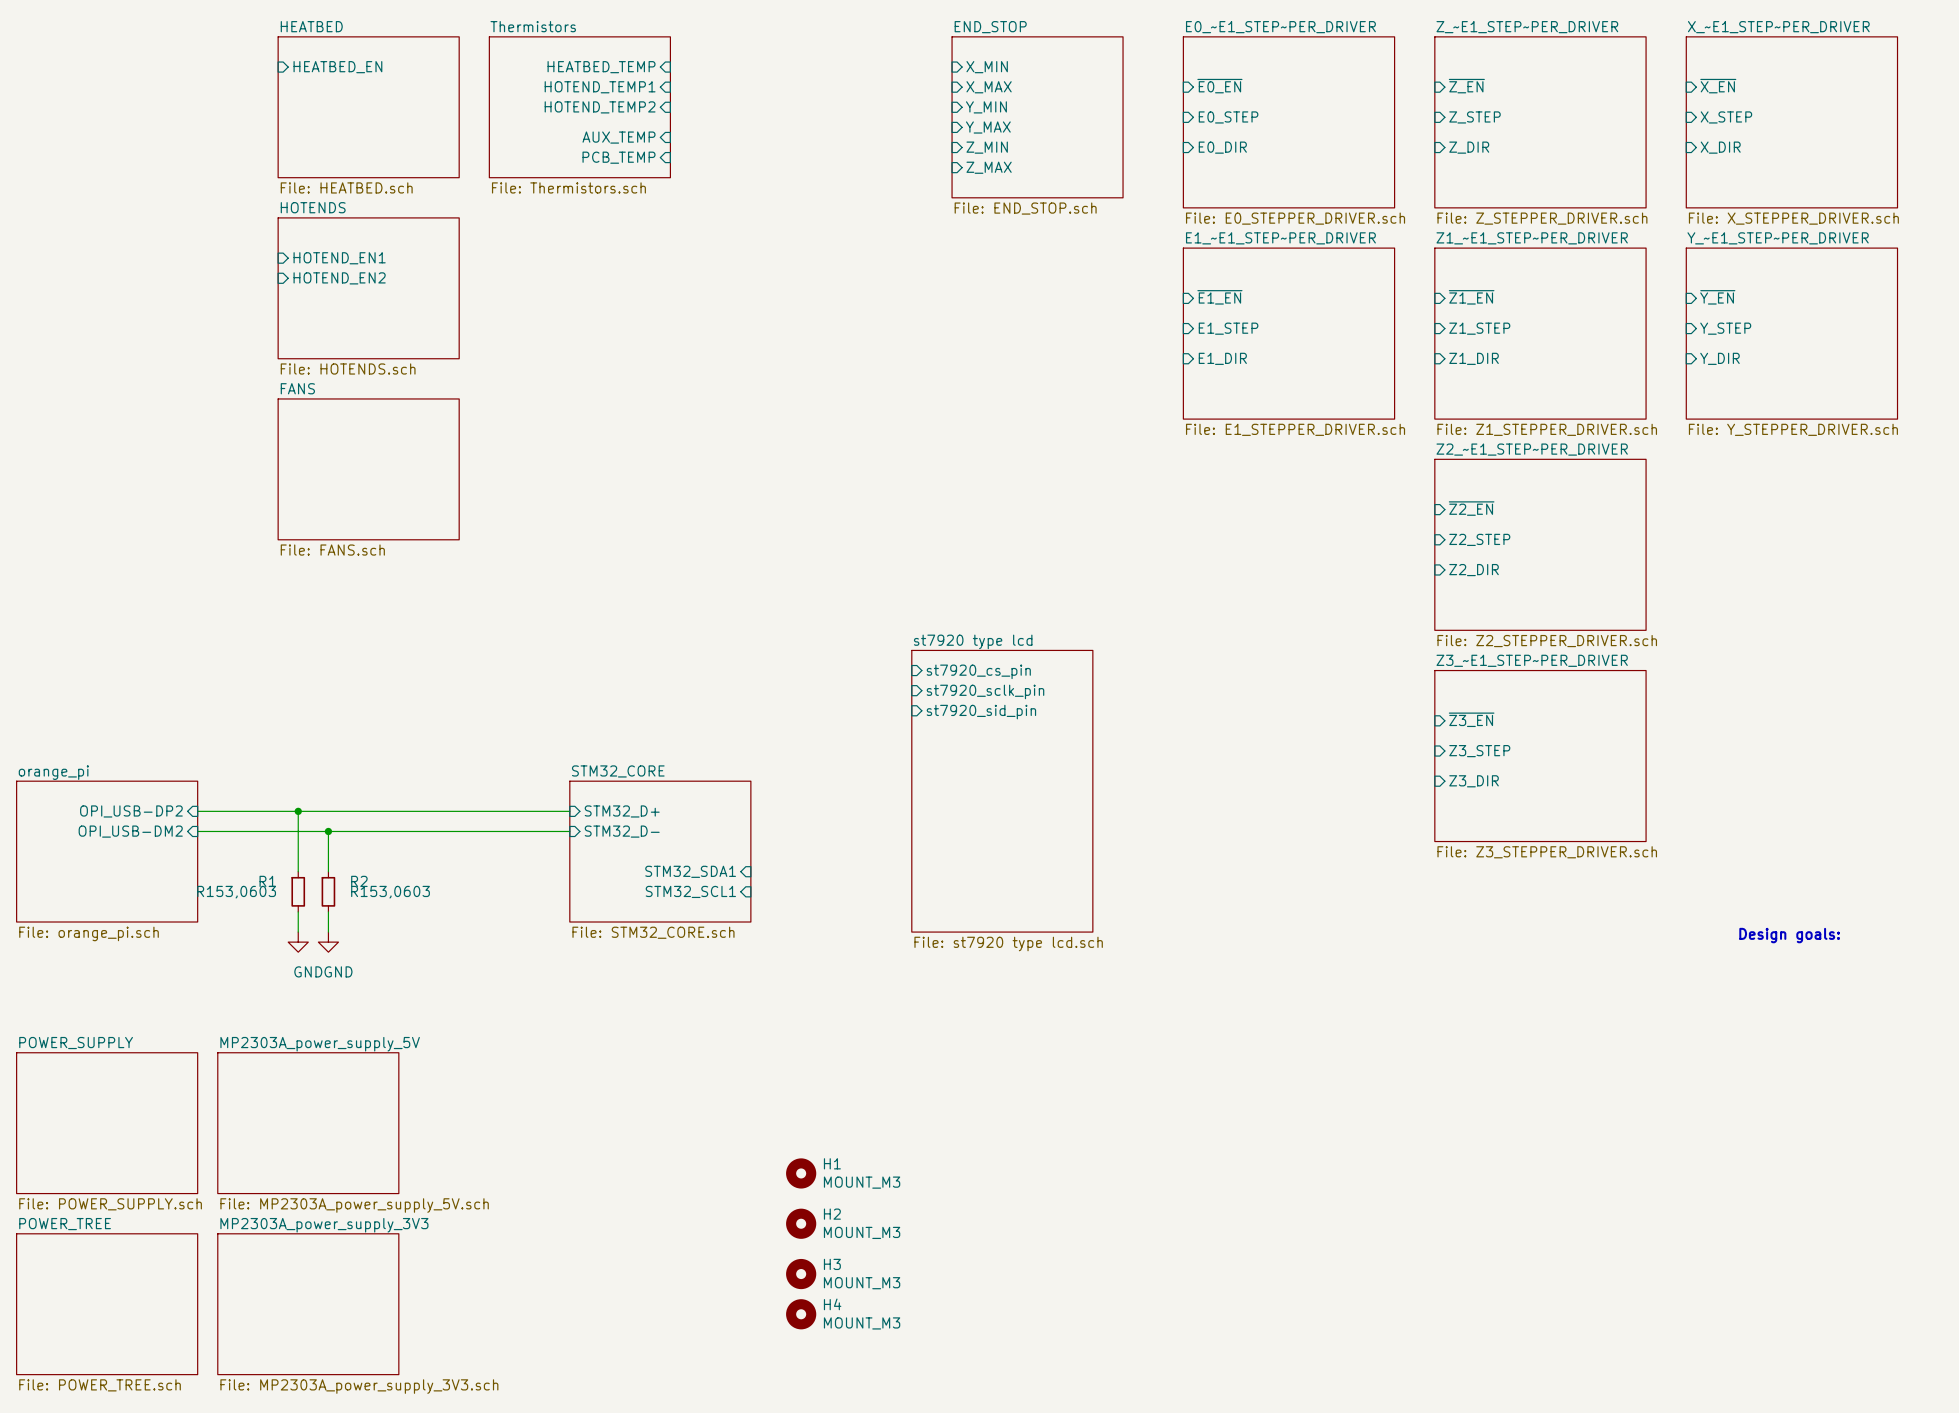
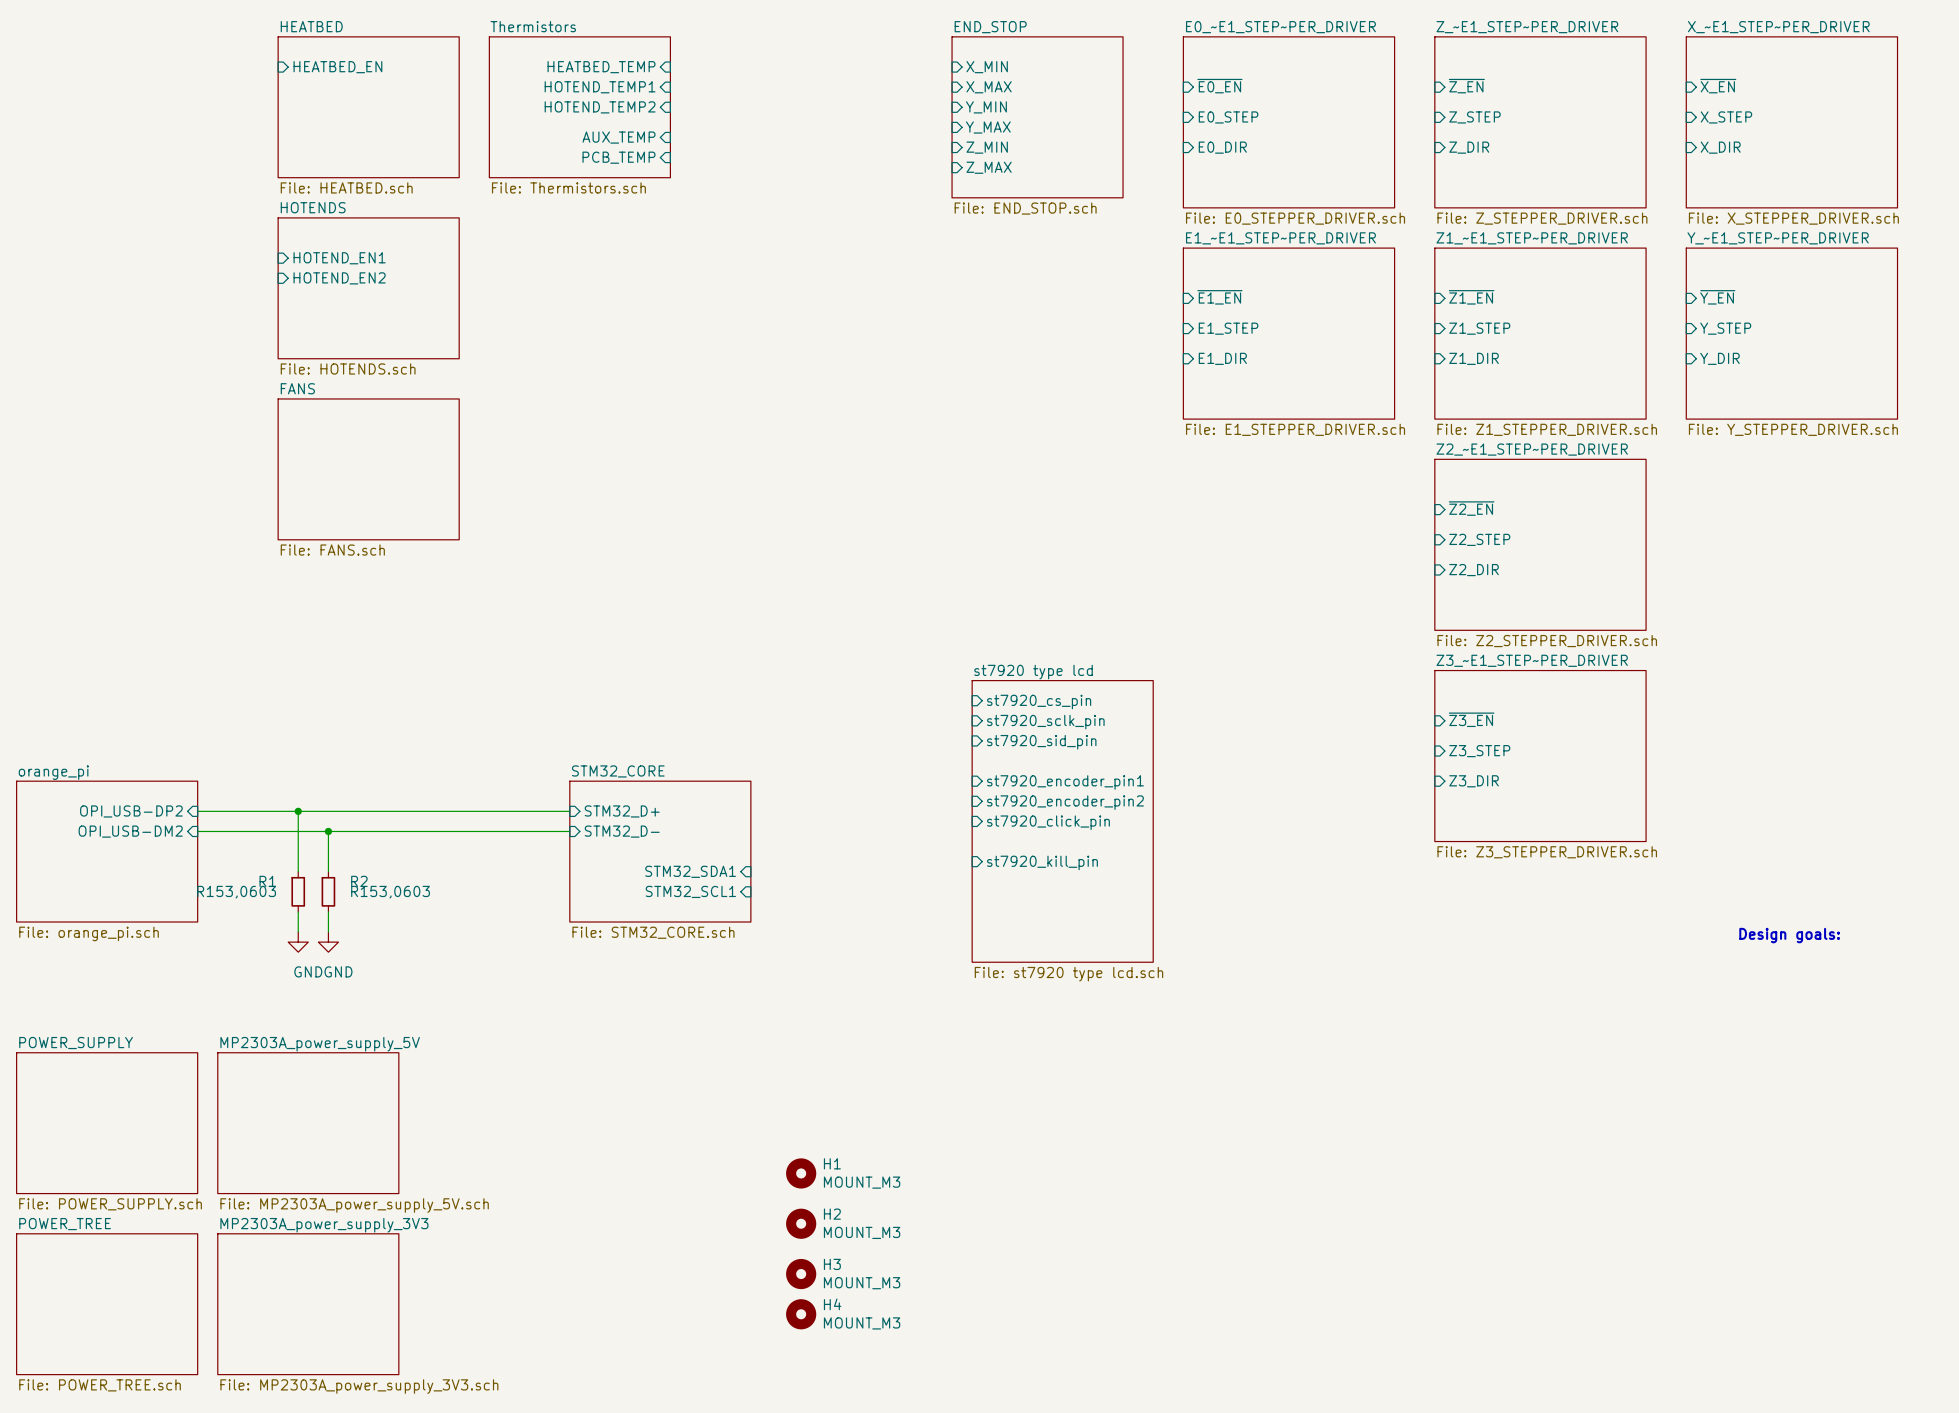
sheet pin position: st7920_cs_pin (978, 671) -> st7920_cs_pin (1039, 702)
sheet pin position: st7920_sclk_pin (985, 691) -> st7920_sclk_pin (1045, 722)
sheet pin position: st7920_sid_pin (981, 712) -> st7920_sid_pin (1041, 742)
sheet pin: none -> st7920_encoder_pin1 (1065, 782)
sheet st7920 type lcd position: (1002, 791) -> (1062, 821)
sheet pin: none -> st7920_encoder_pin2 (1065, 802)
sheet pin: none -> st7920_click_pin (1048, 822)
sheet pin: none -> st7920_kill_pin (1042, 862)

